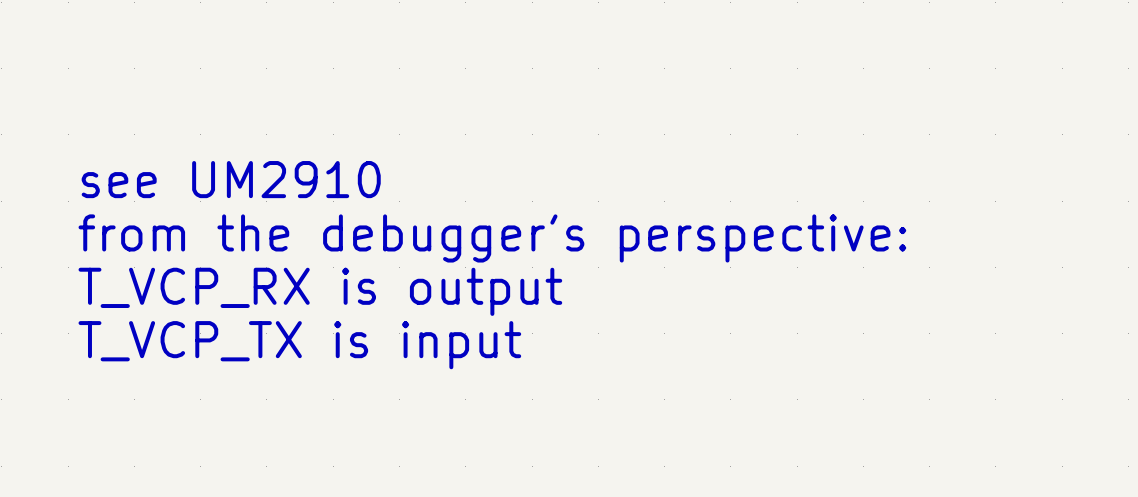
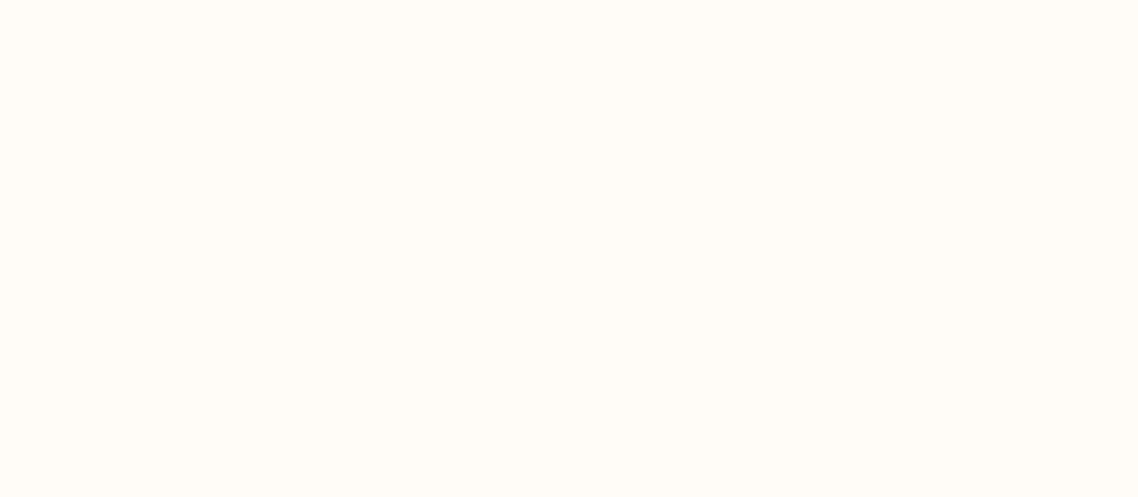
text: see UM2910 (231, 179) -> none
text: from the debugger's perspective: (492, 238) -> none
text: T_VCP_RX is output (320, 291) -> none
text: T_VCP_TX is input (299, 345) -> none

